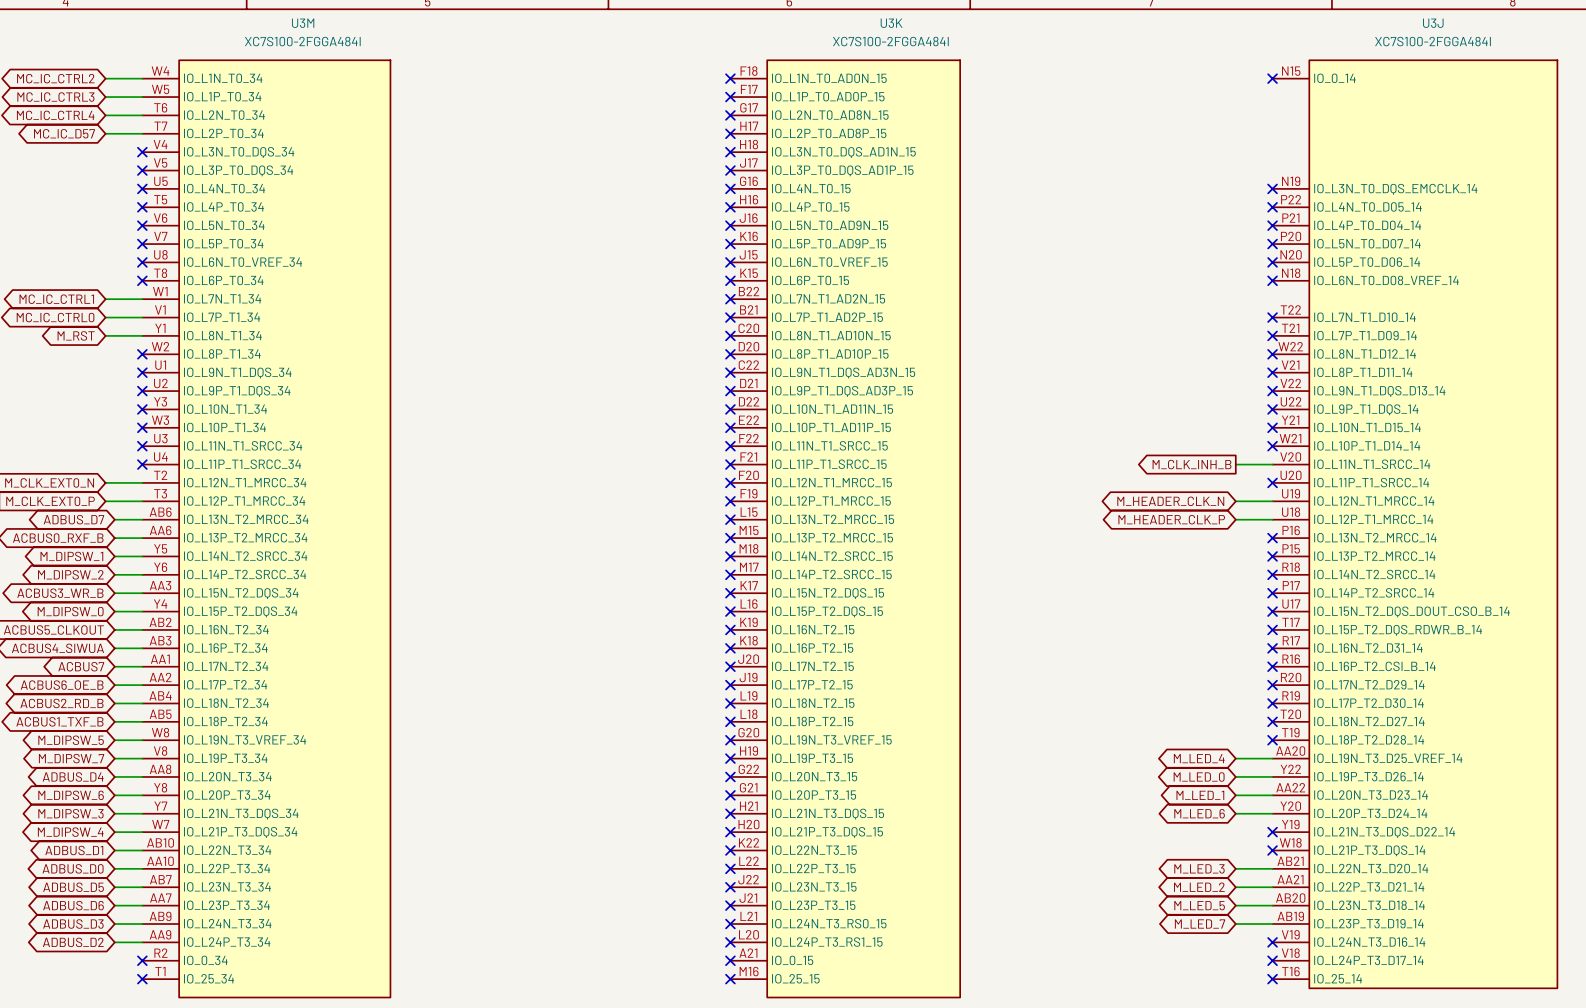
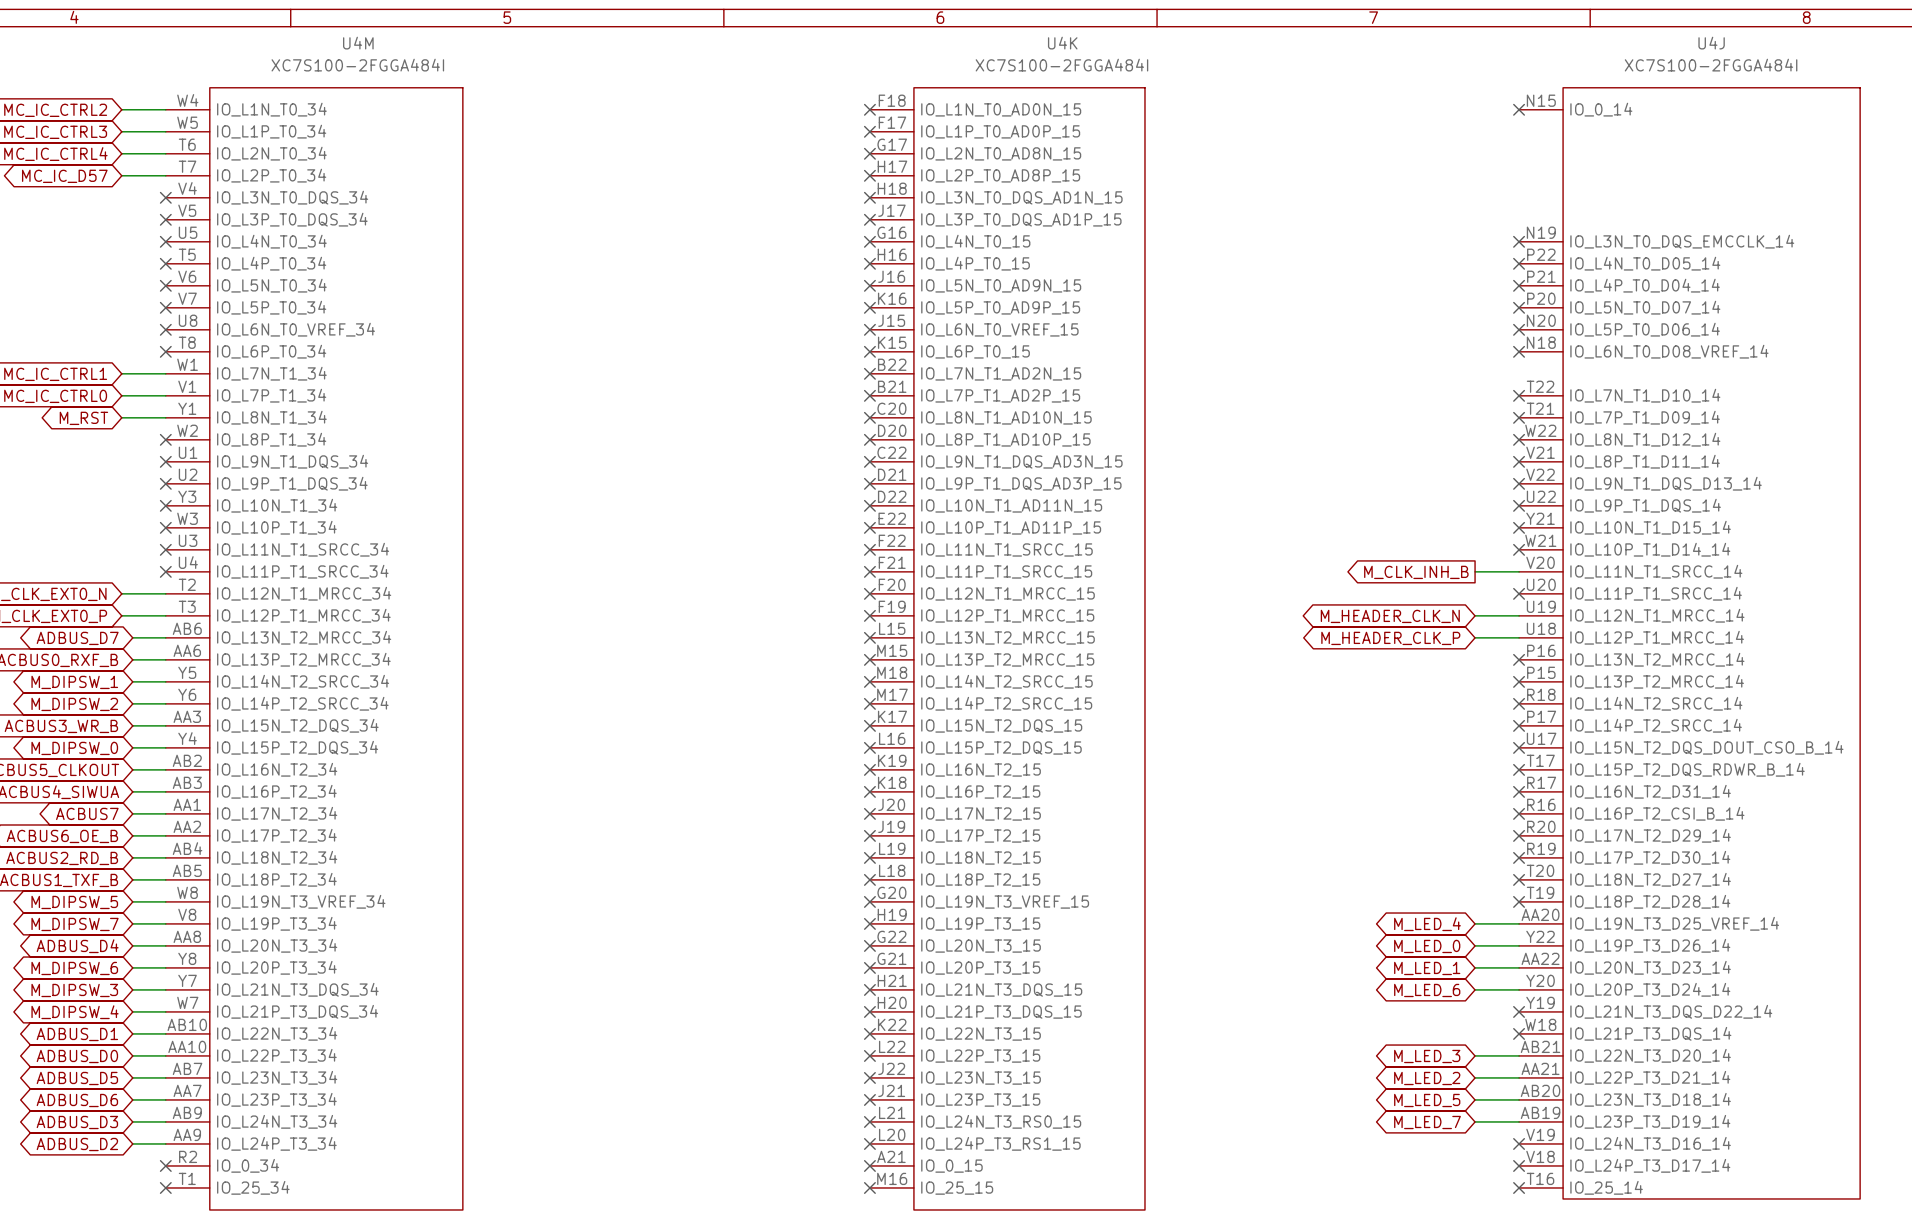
U3M name: U3M (303, 23) -> U4M (358, 43)
U3K name: U3K (891, 23) -> U4K (1062, 43)
U3J name: U3J (1433, 23) -> U4J (1711, 43)

